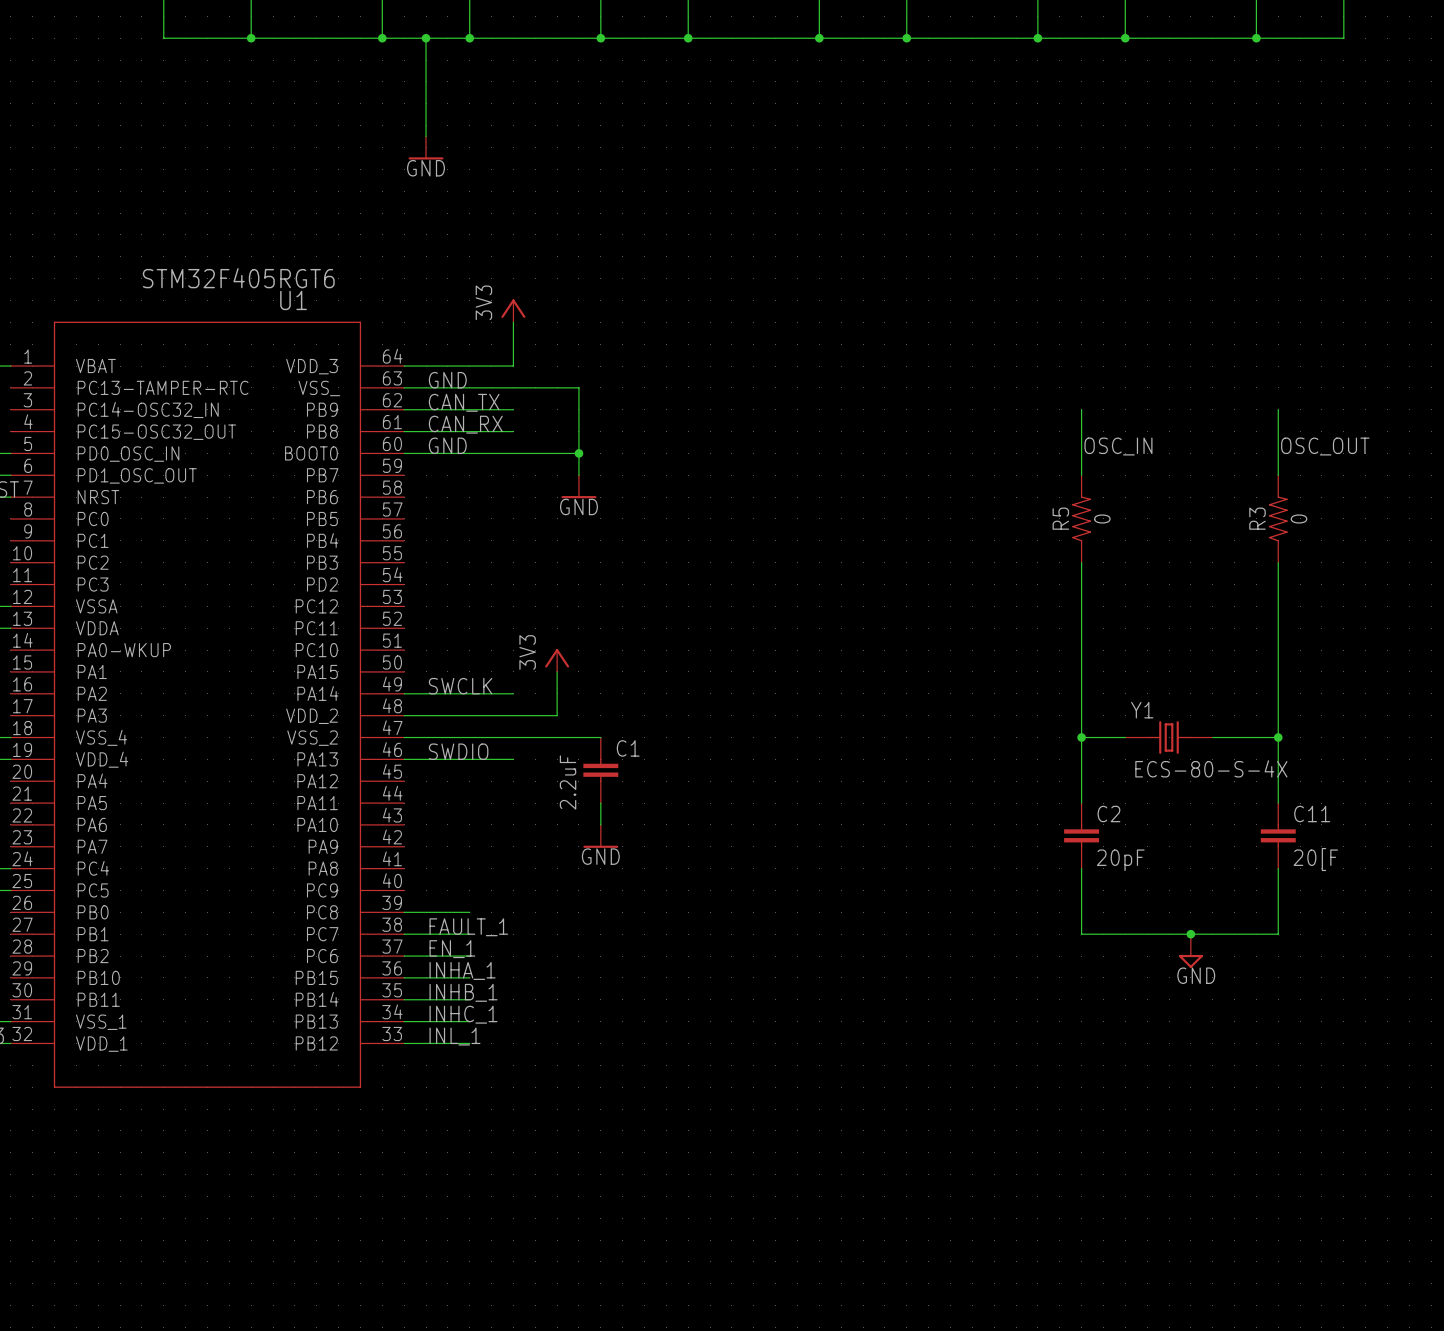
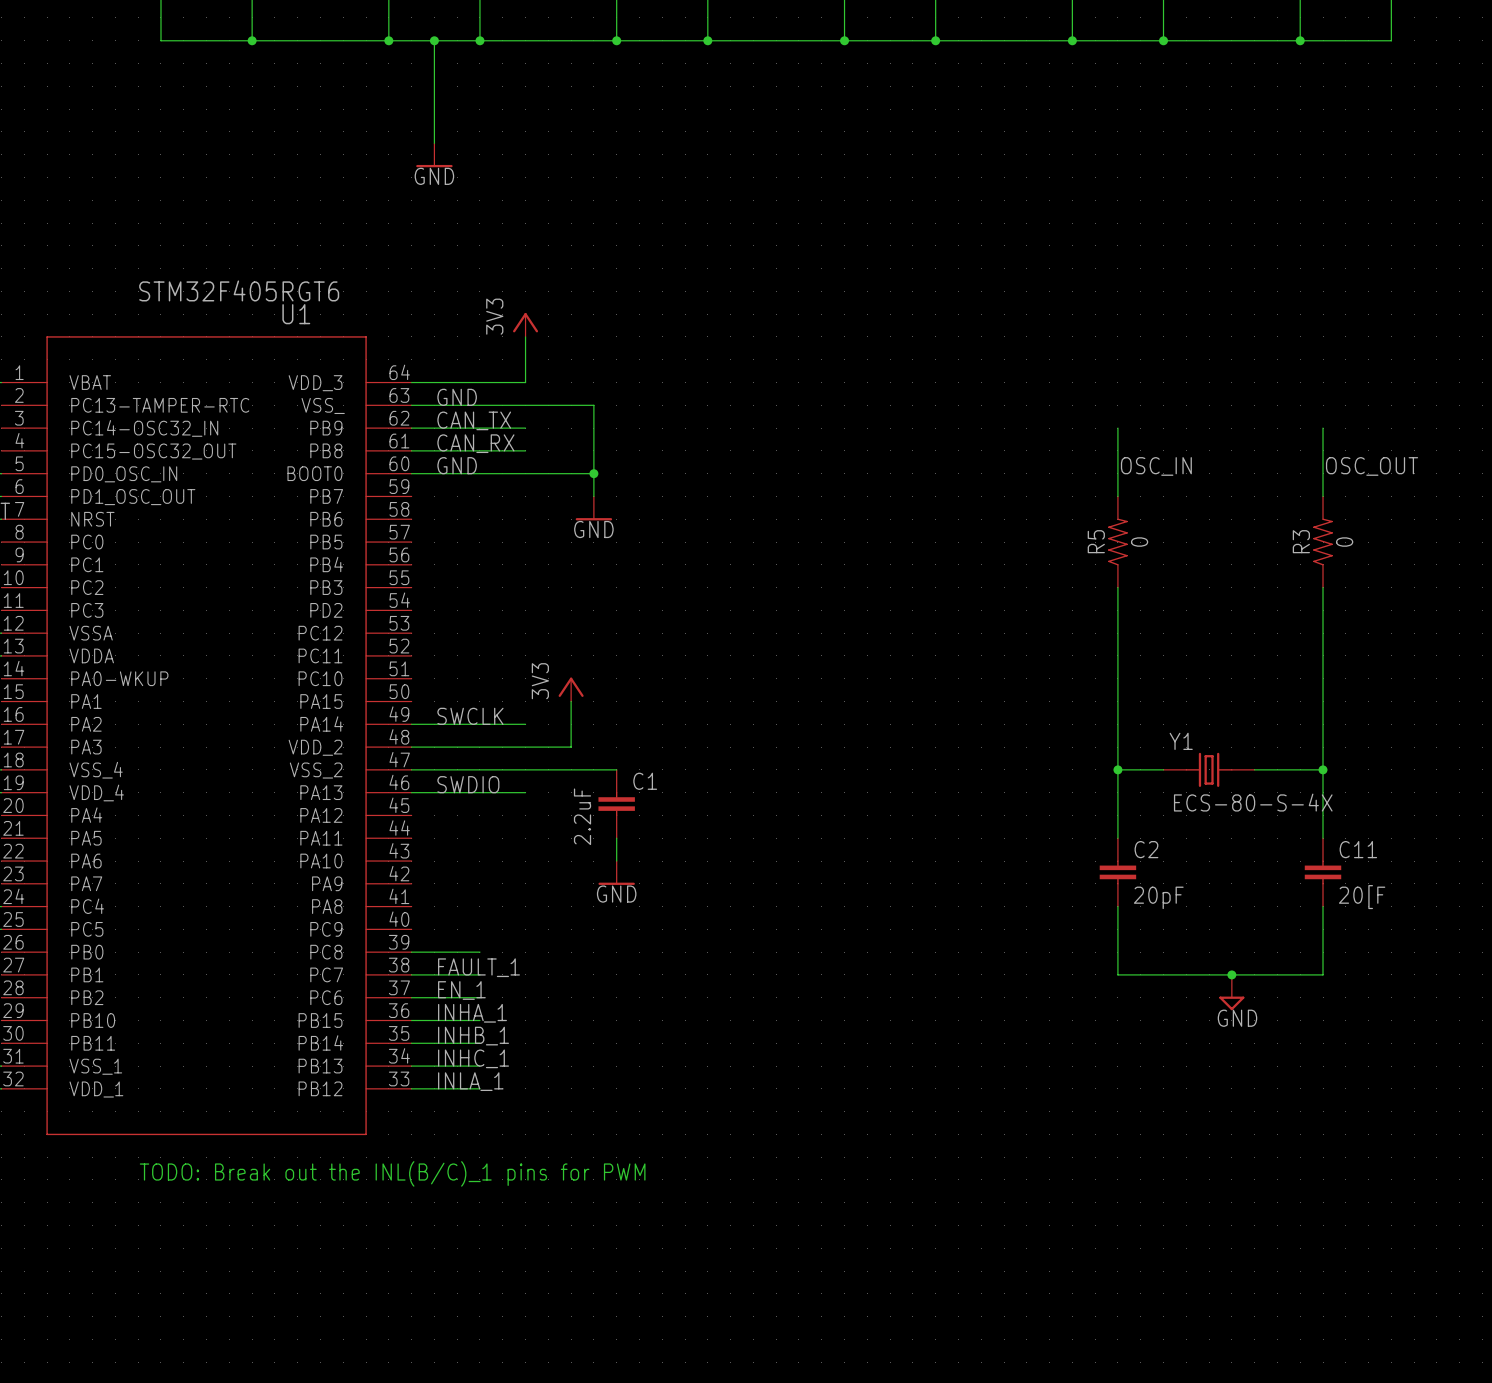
label: INL_1 (455, 1036) -> INLA_1 (470, 1081)
text: none -> TODO: Break out the INL(B/C)_1 pins for PWM (392, 1173)

